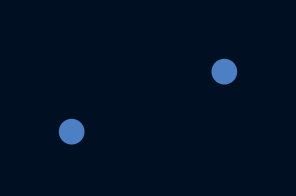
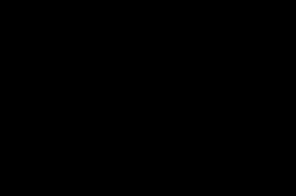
part: (224, 71) -> none
part: (71, 131) -> none

